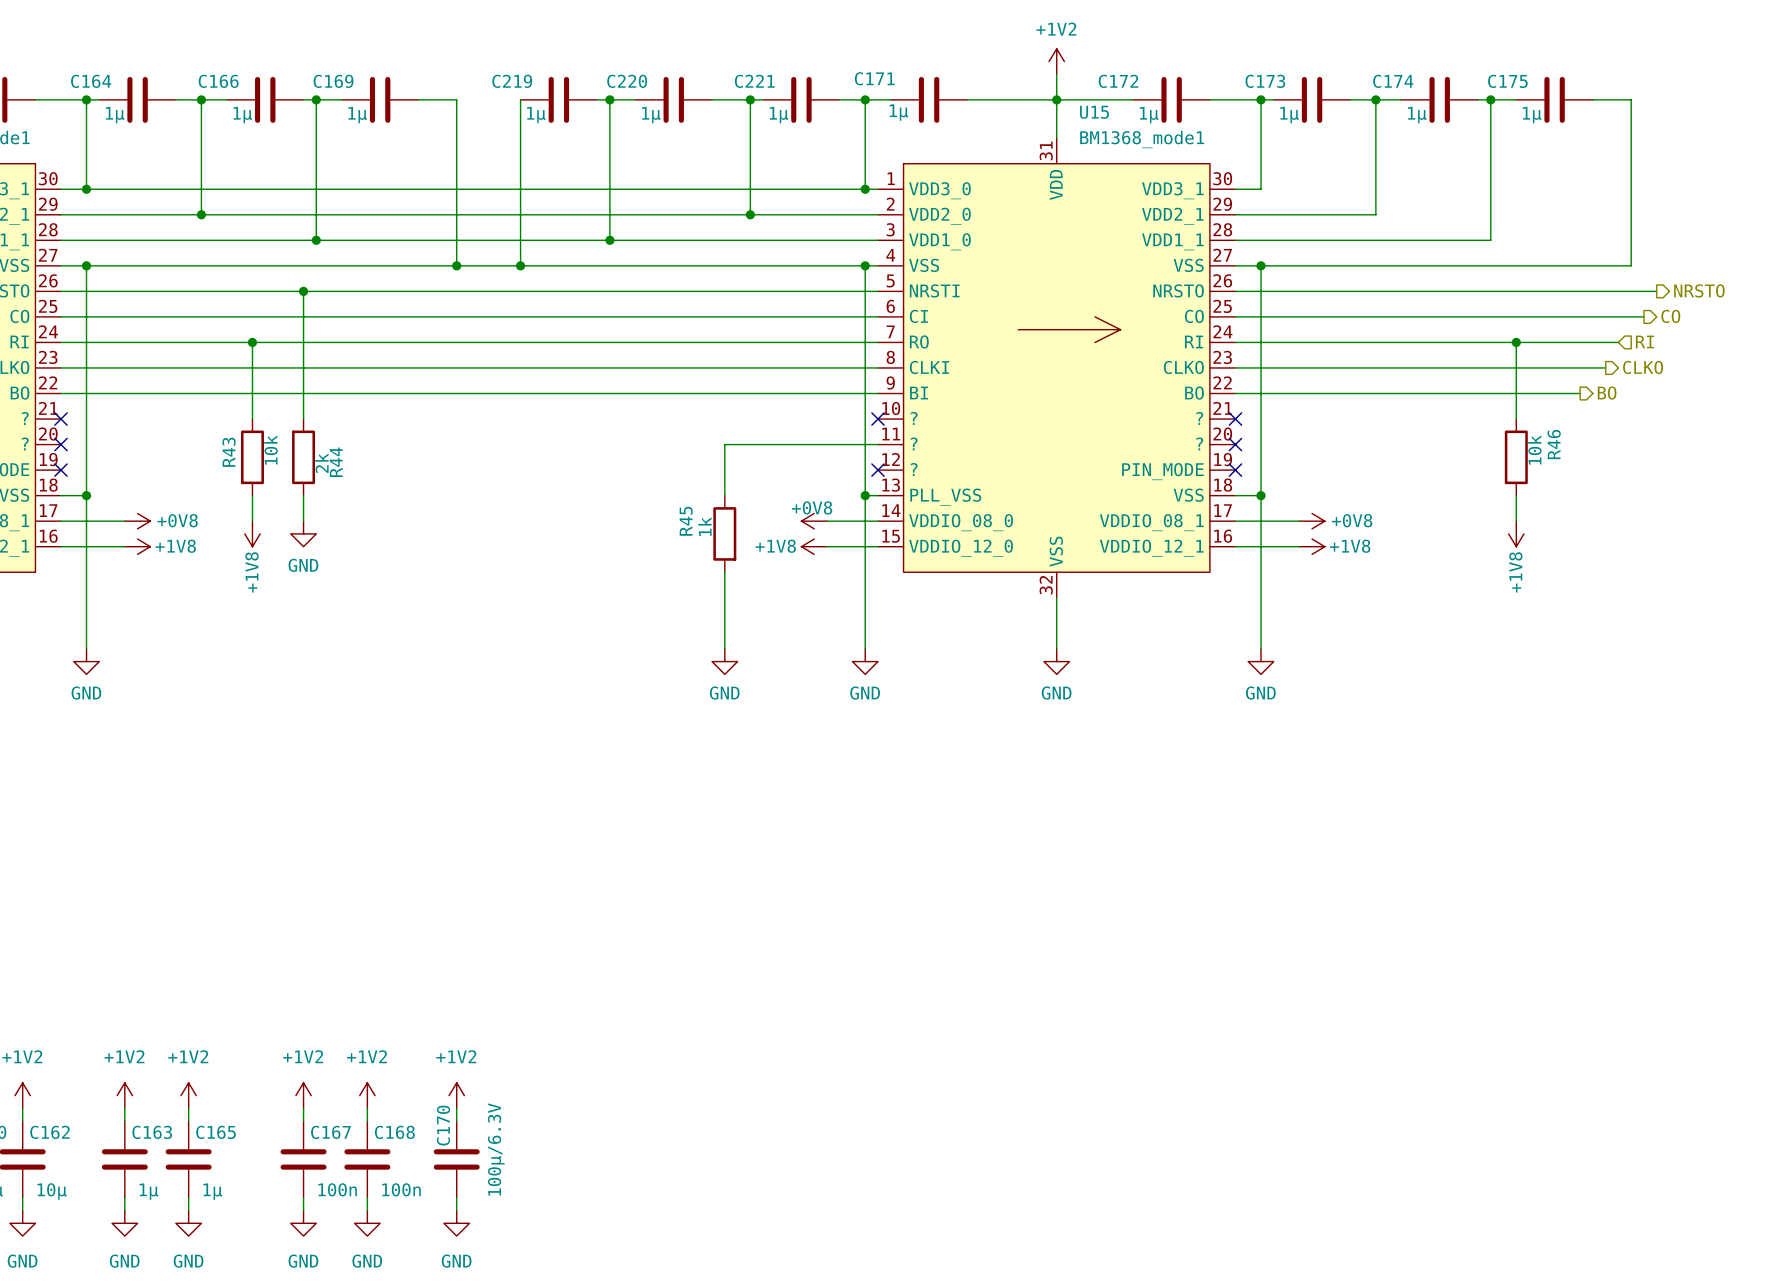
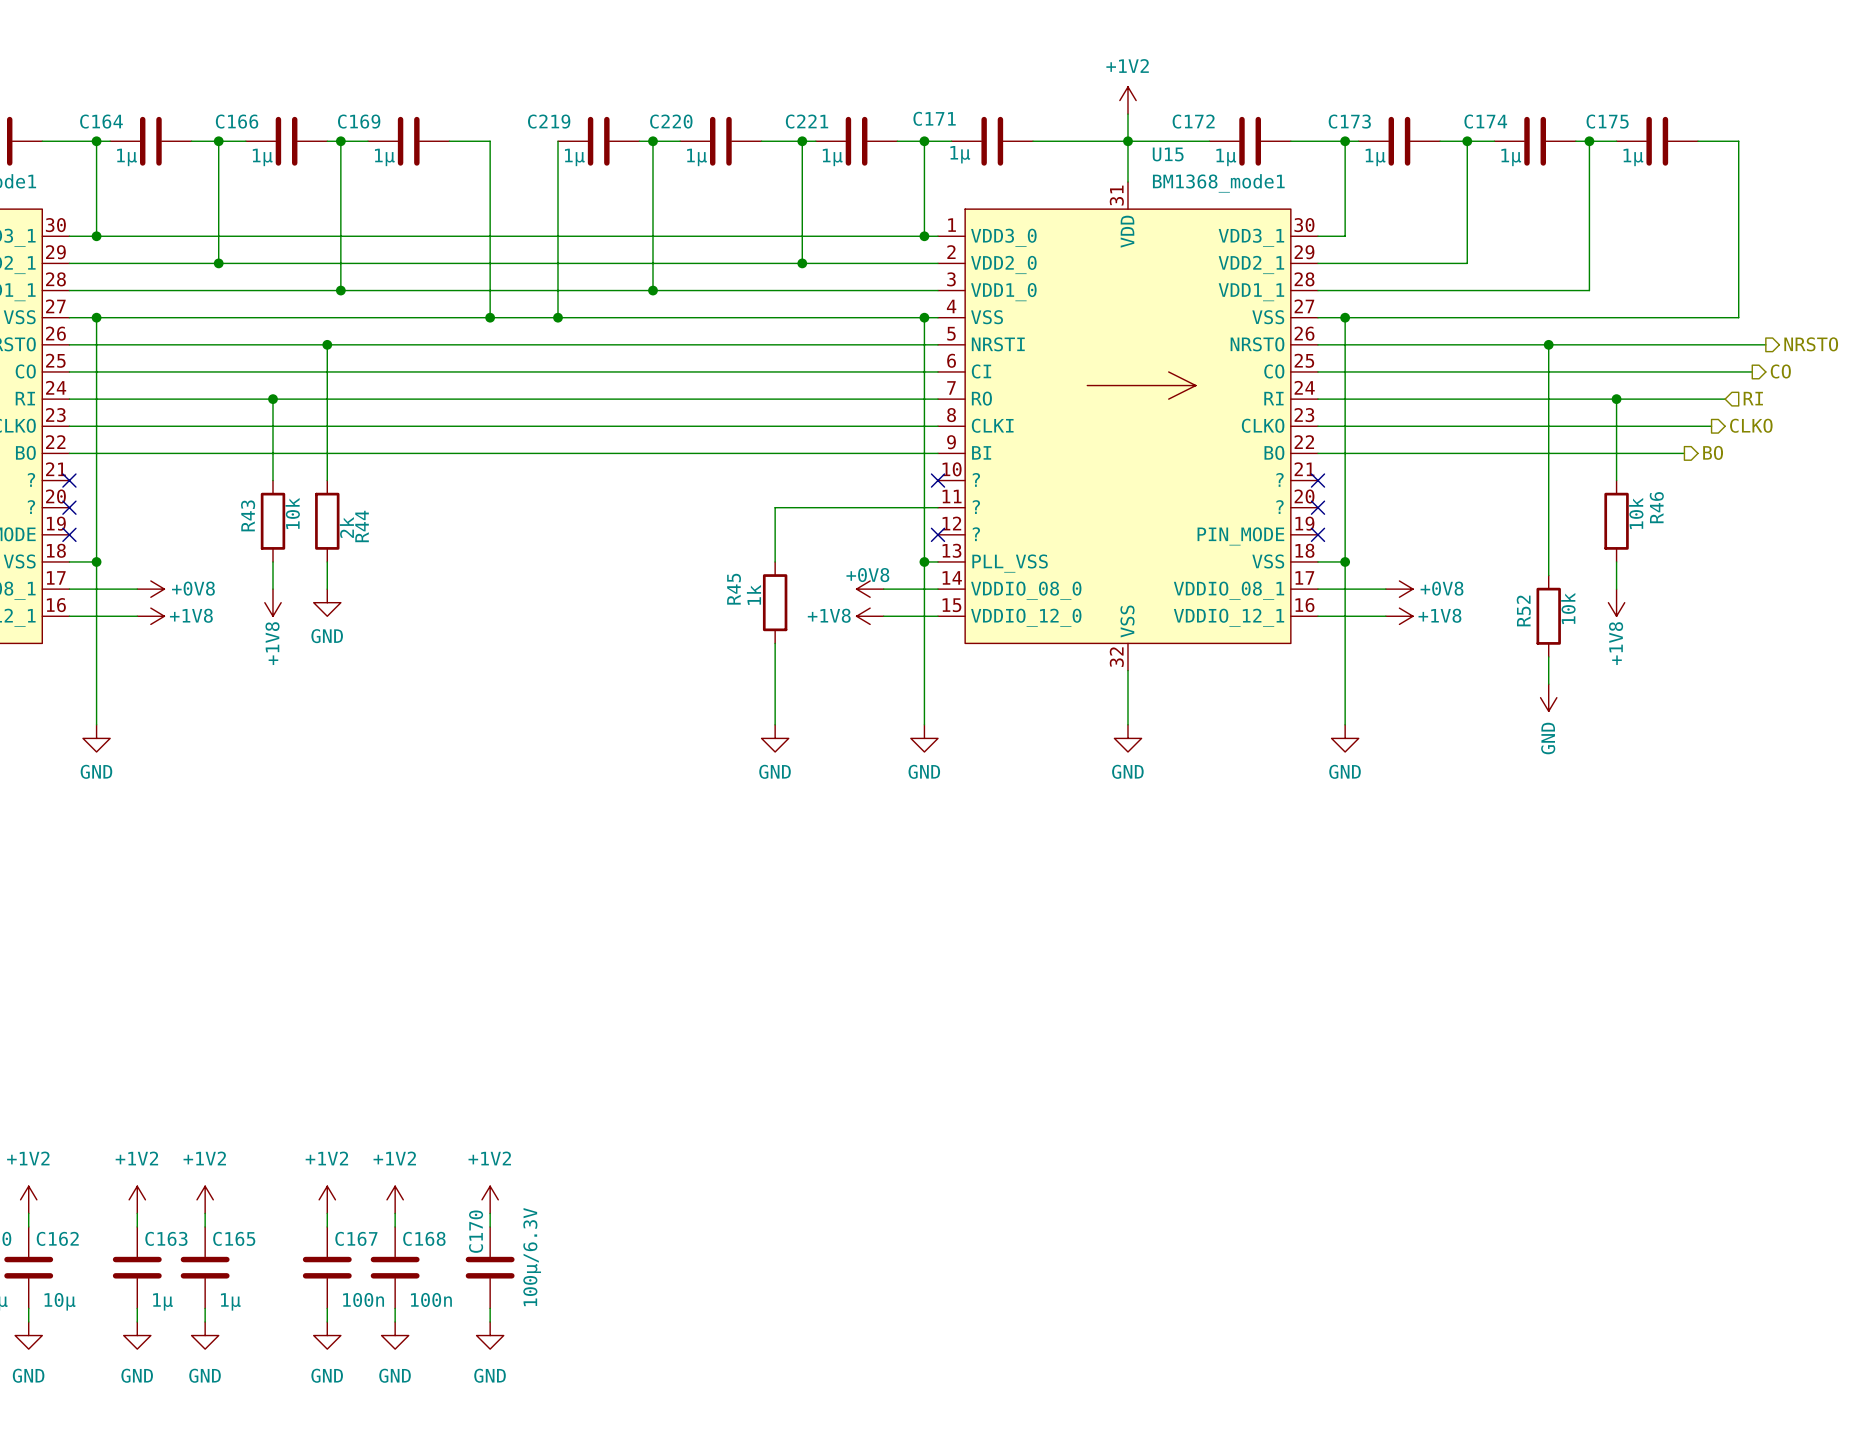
wire: none -> (1548, 344) (1548, 575)
junction: none -> (1548, 344)
R52: none -> 10k (1548, 616)
wire: none -> (1548, 656) (1548, 684)
power symbol: none -> GND (1548, 697)

